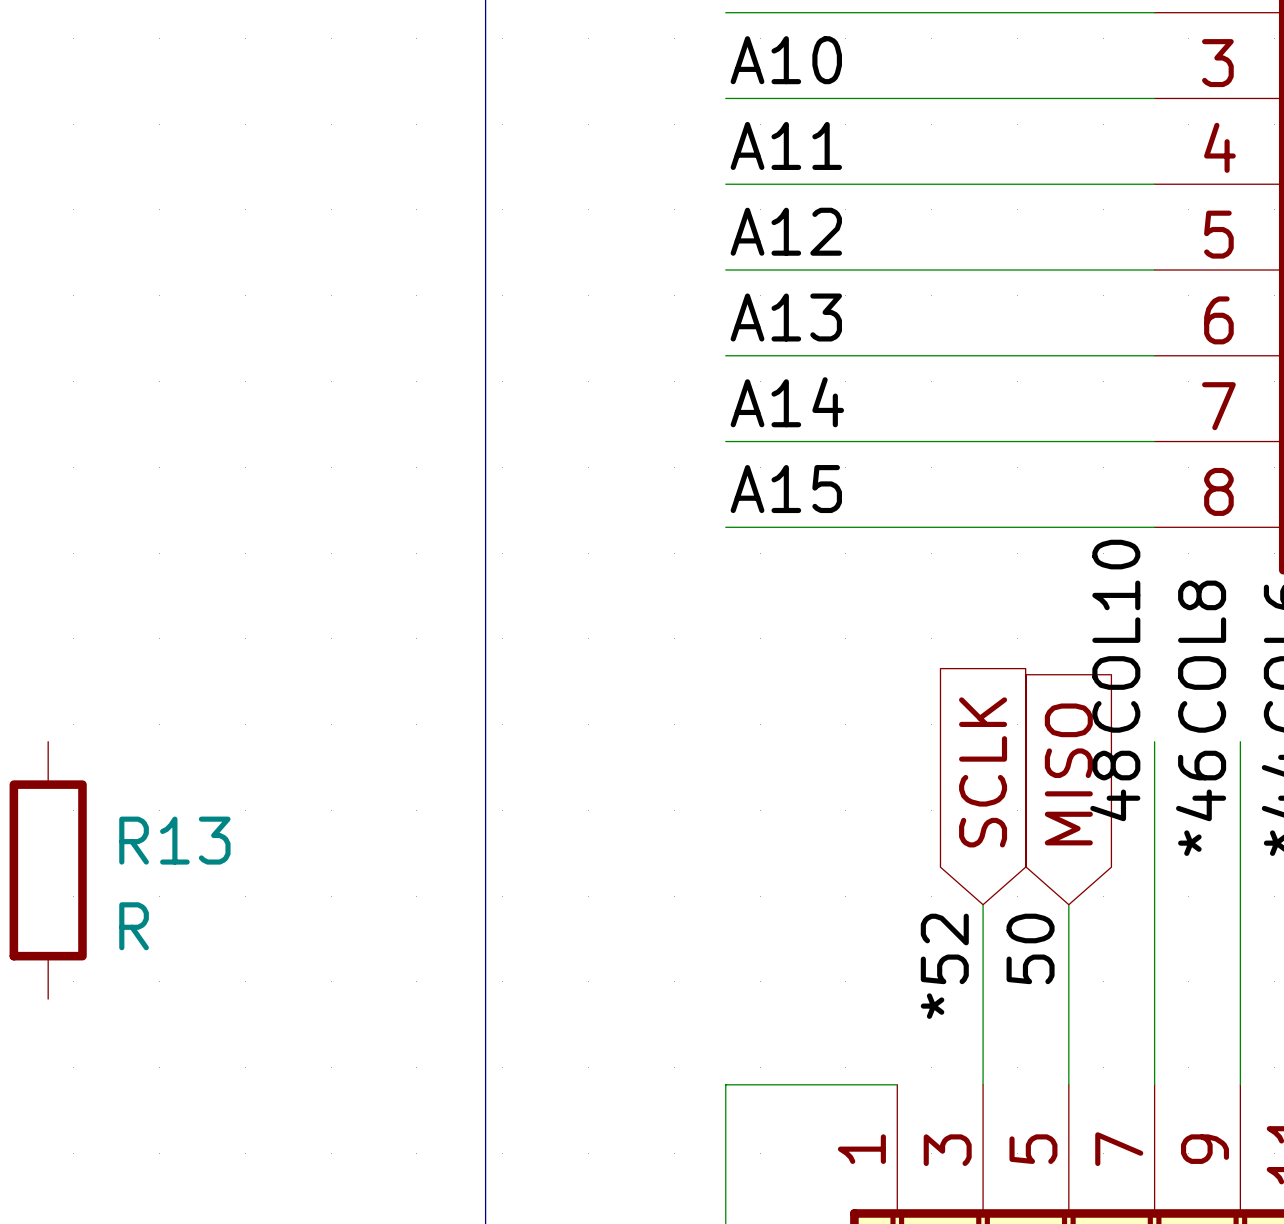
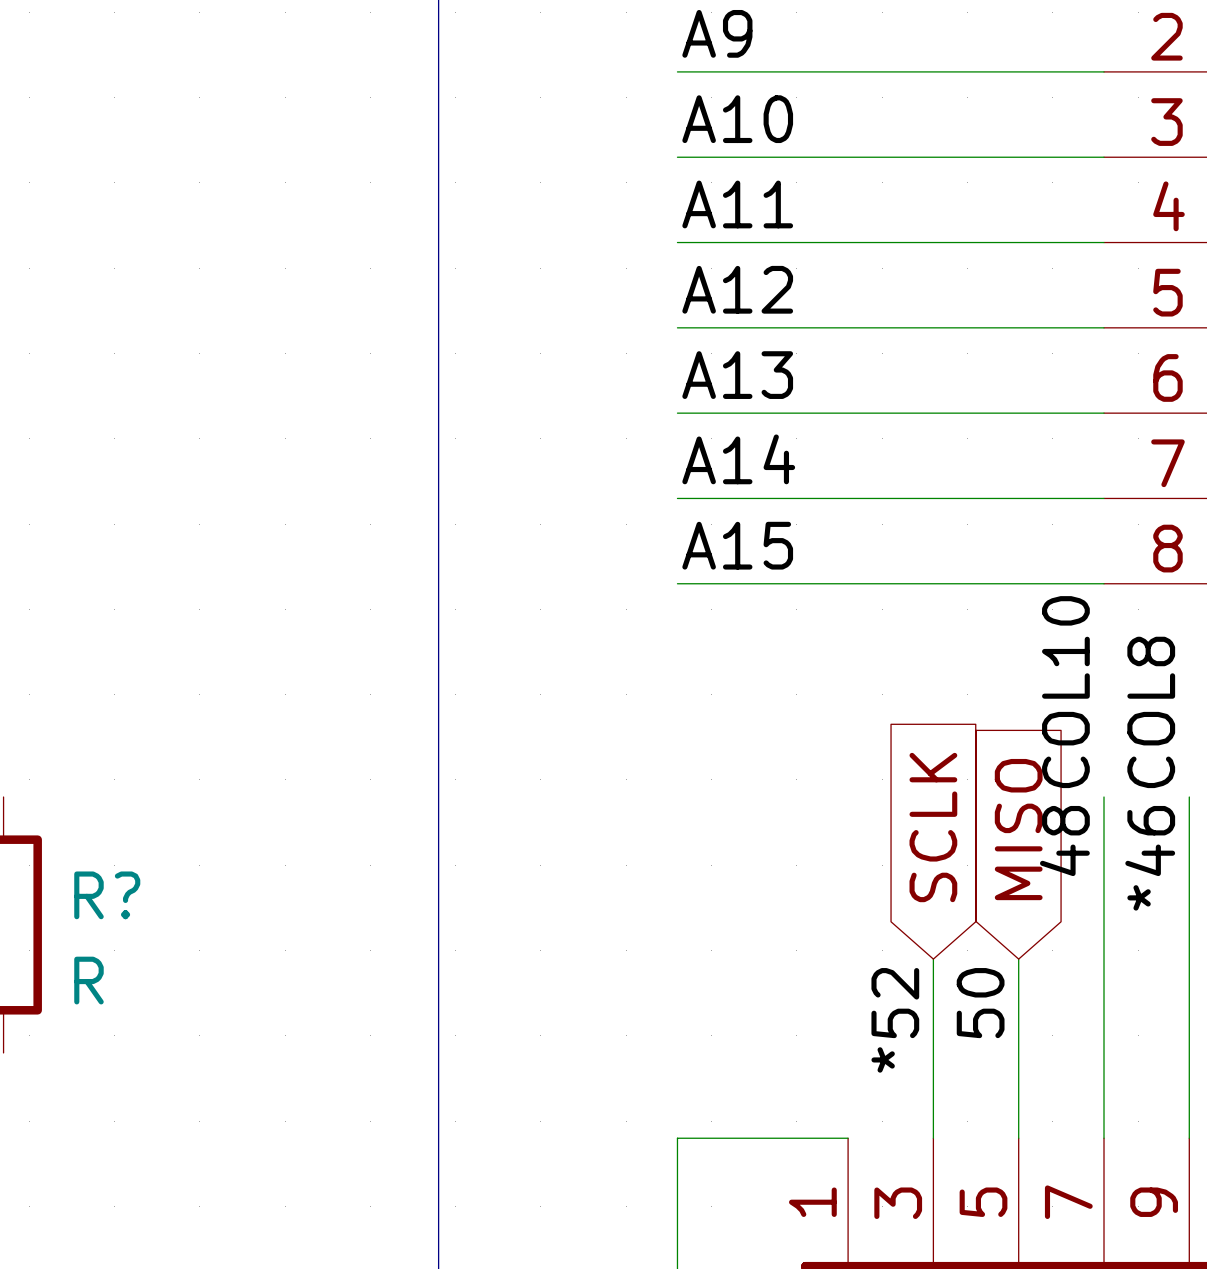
R13 name: R13 (174, 840) -> R? (107, 895)

